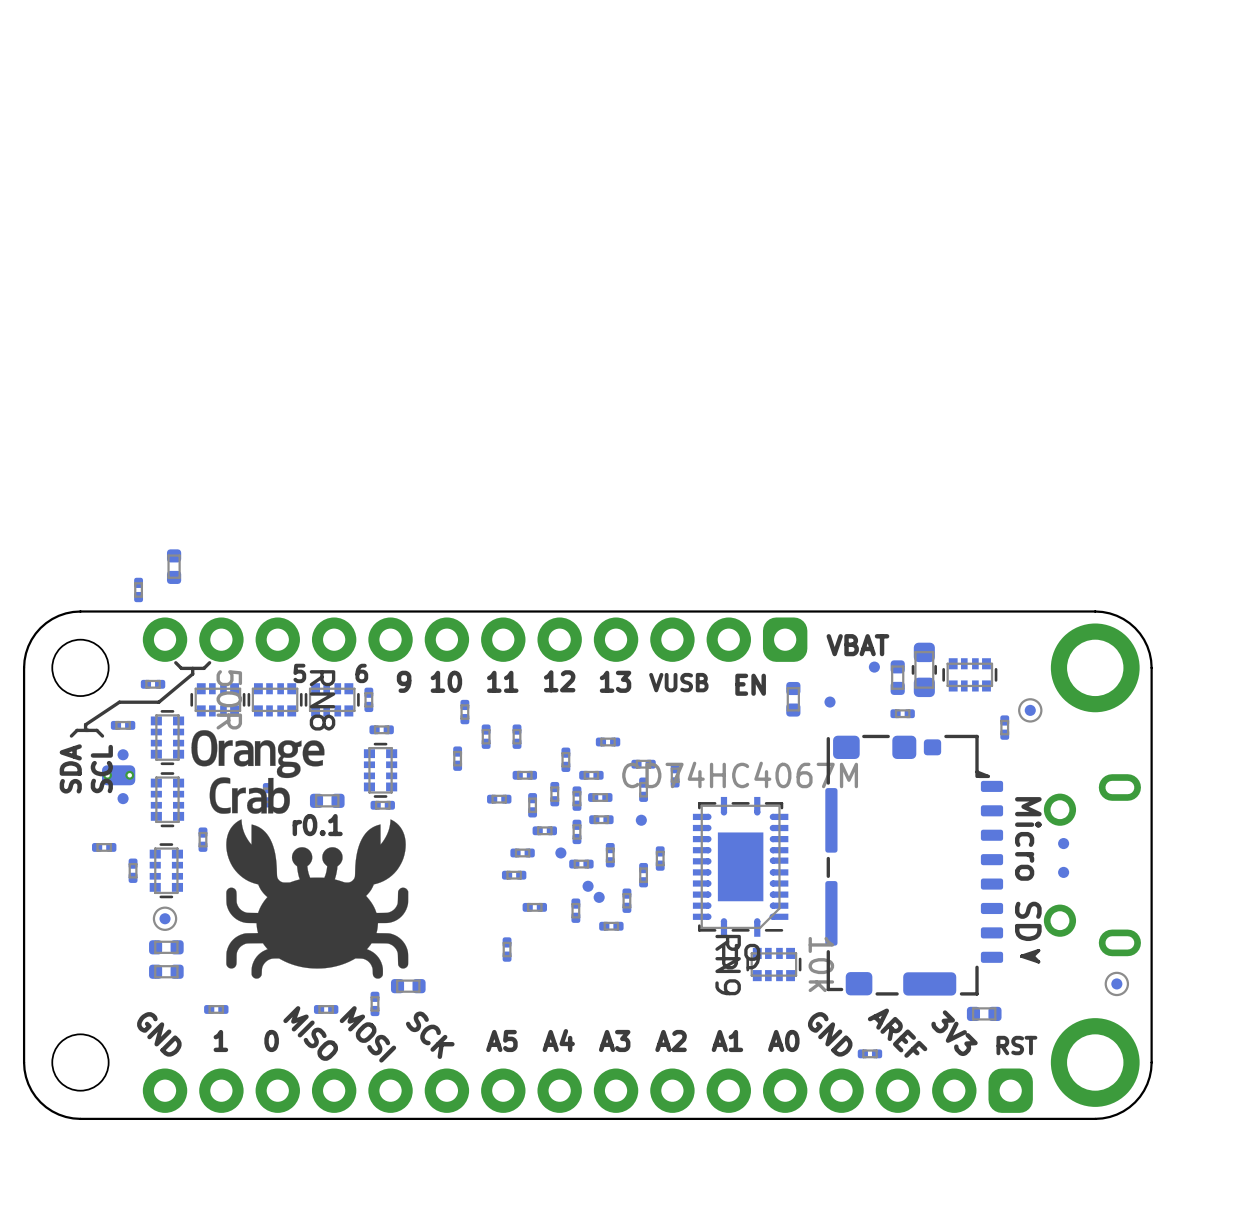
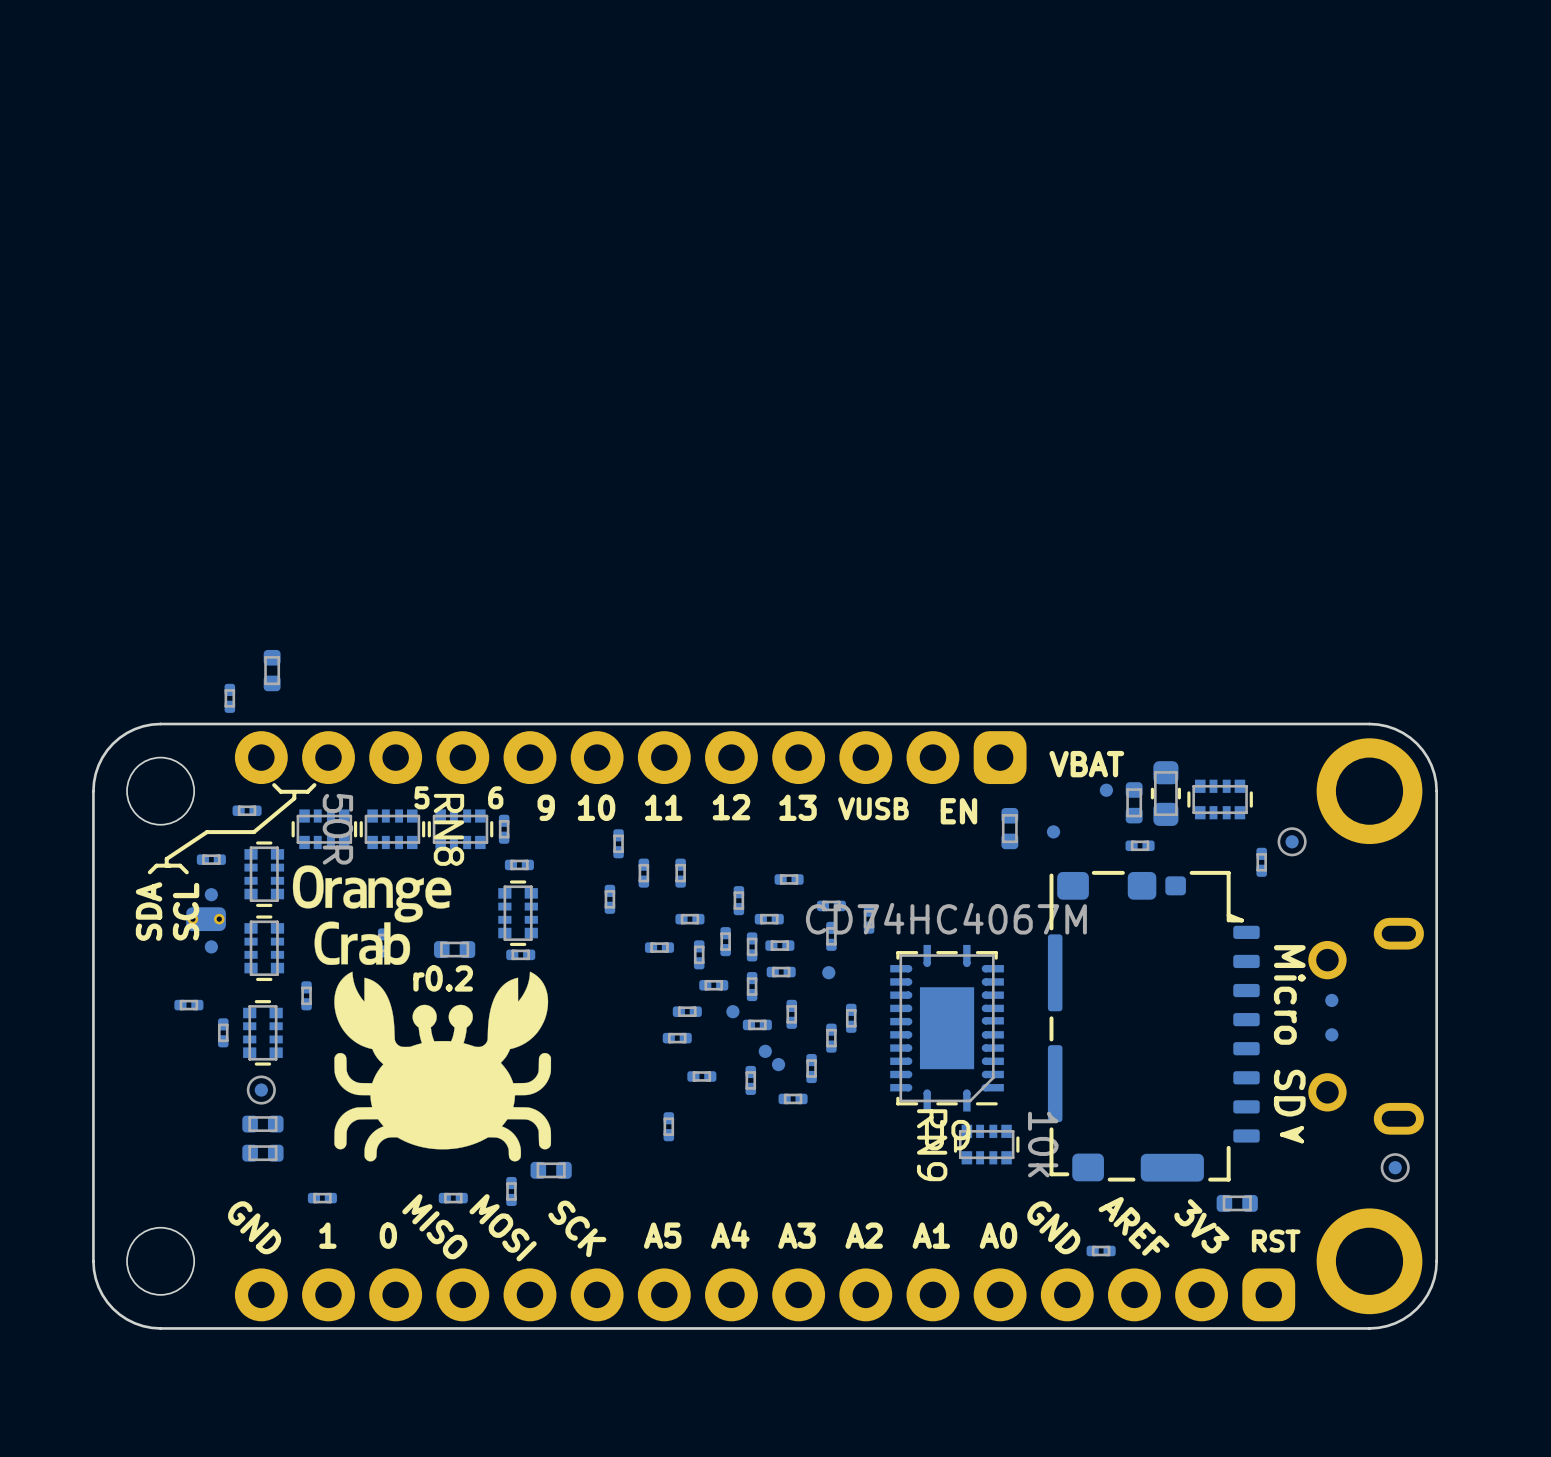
text: r0.1 (317, 825) -> r0.2 (443, 978)

